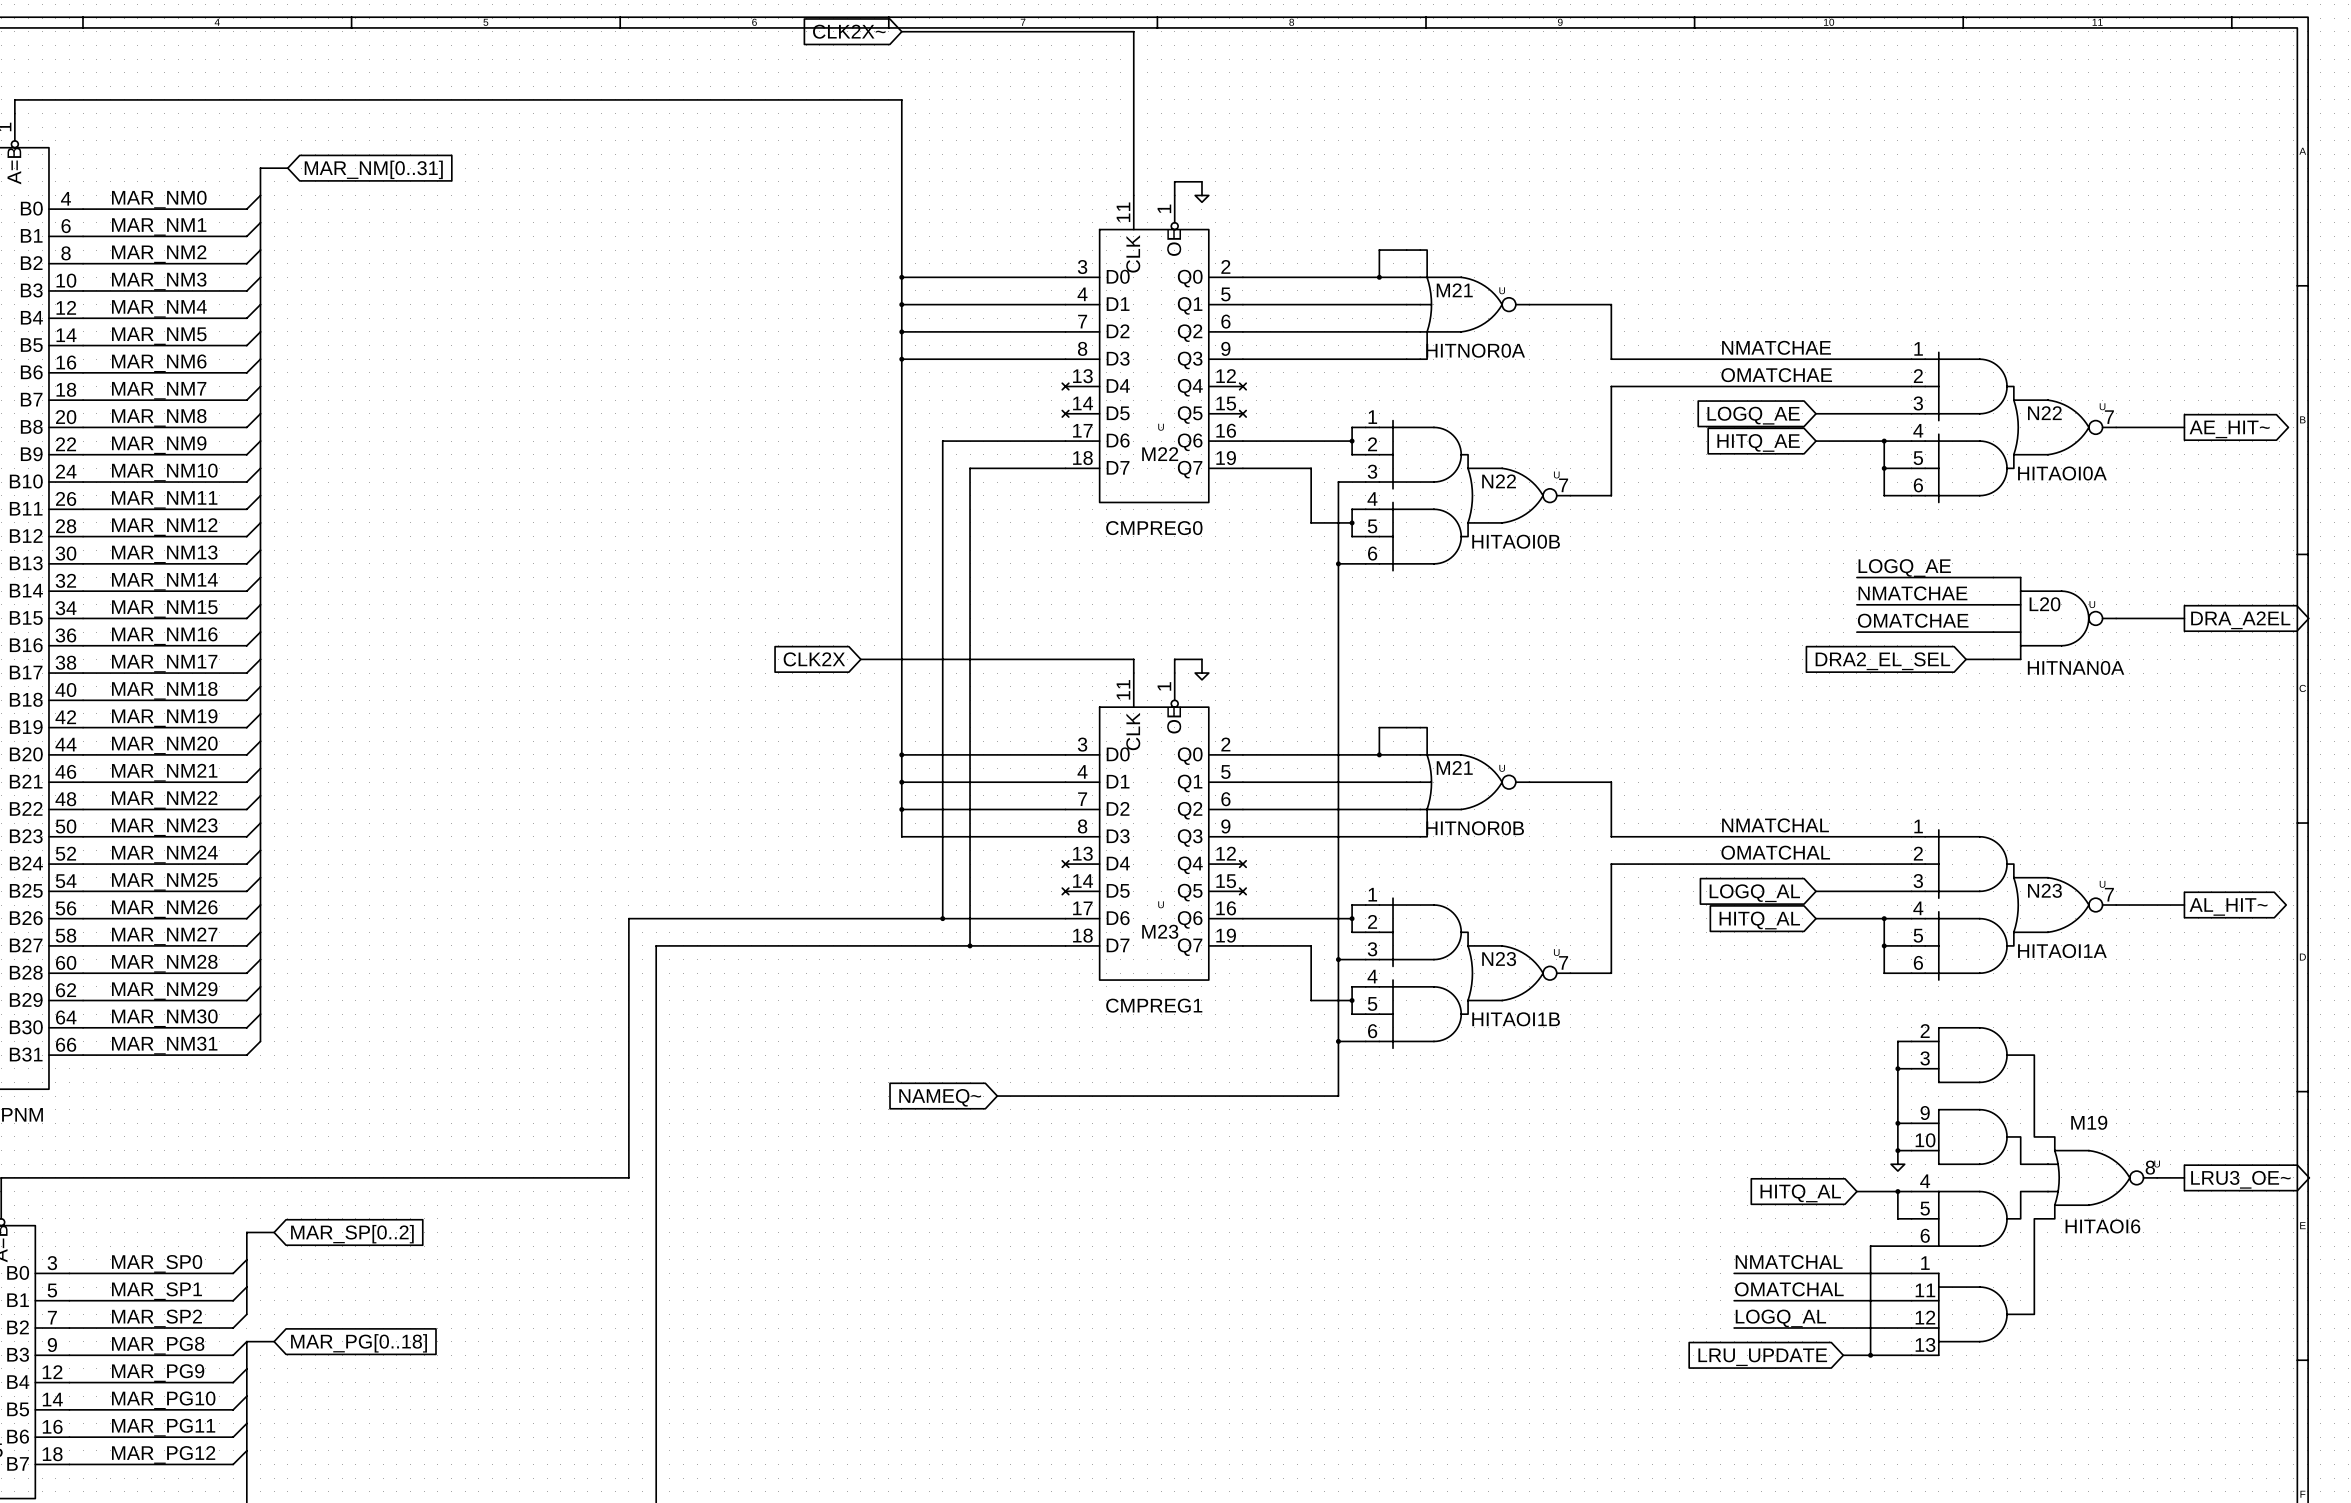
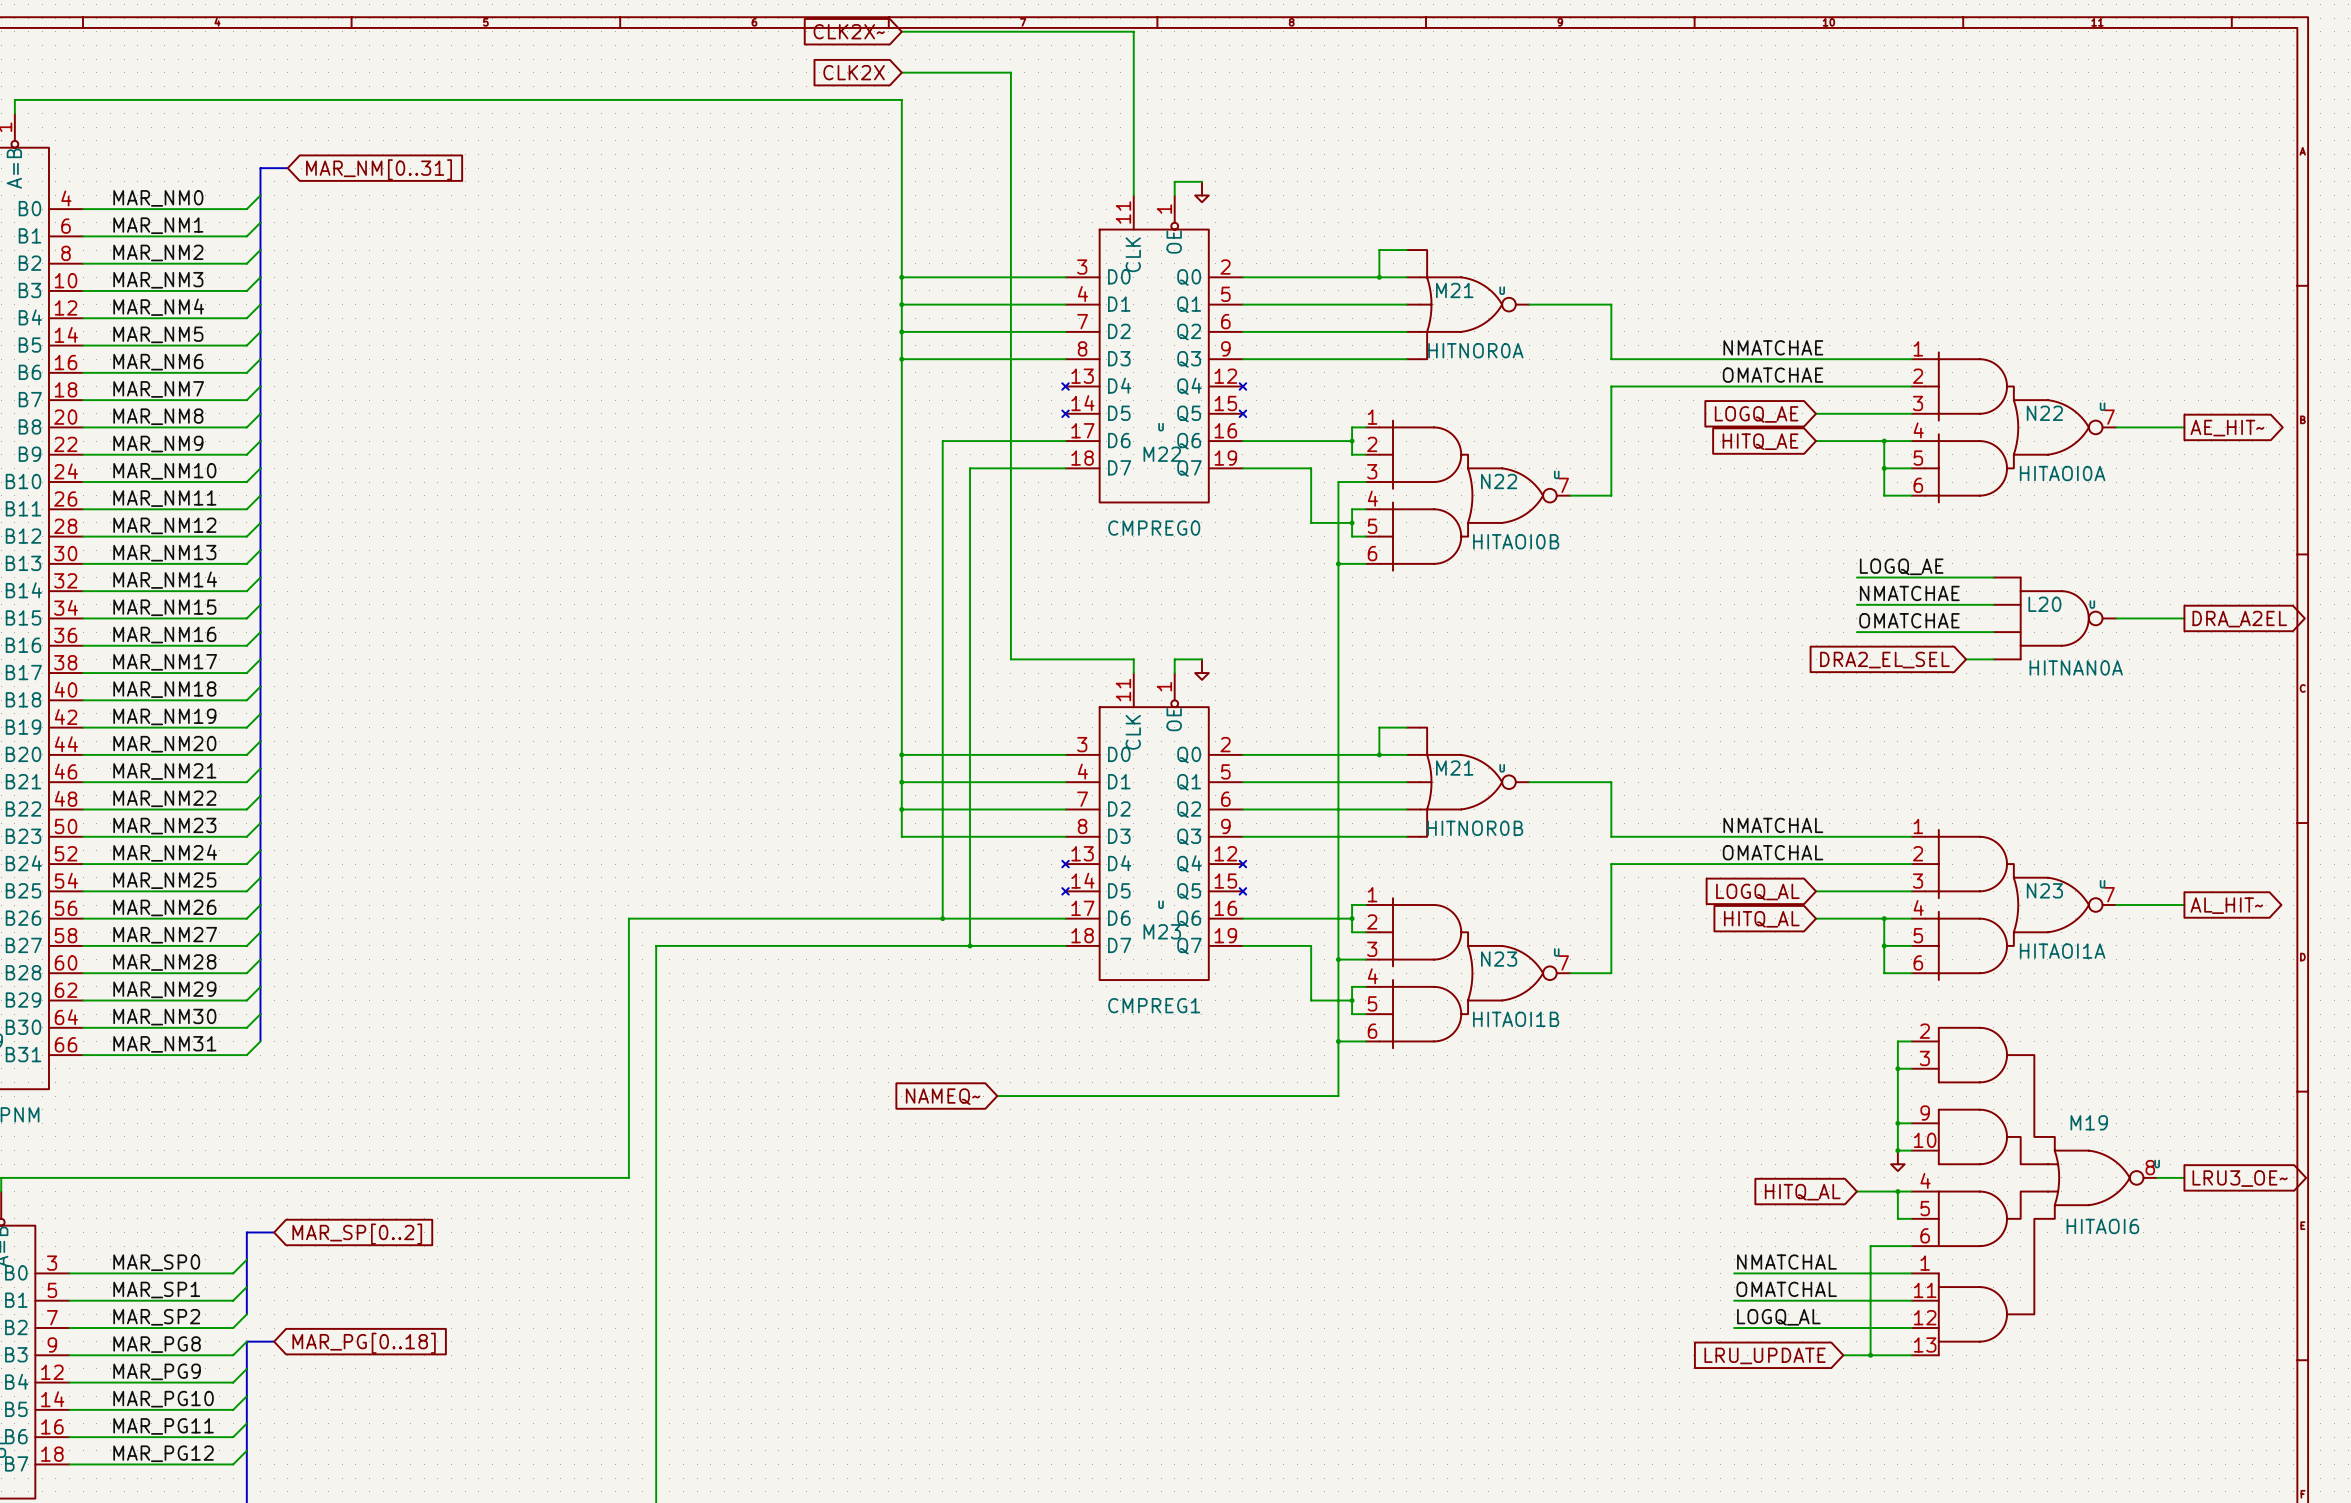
global label: none -> CLK2X (854, 72)
global label: CLK2X (814, 659) -> none
wire: (860, 659) (1010, 659) -> (901, 72) (1010, 72) (1010, 659)

